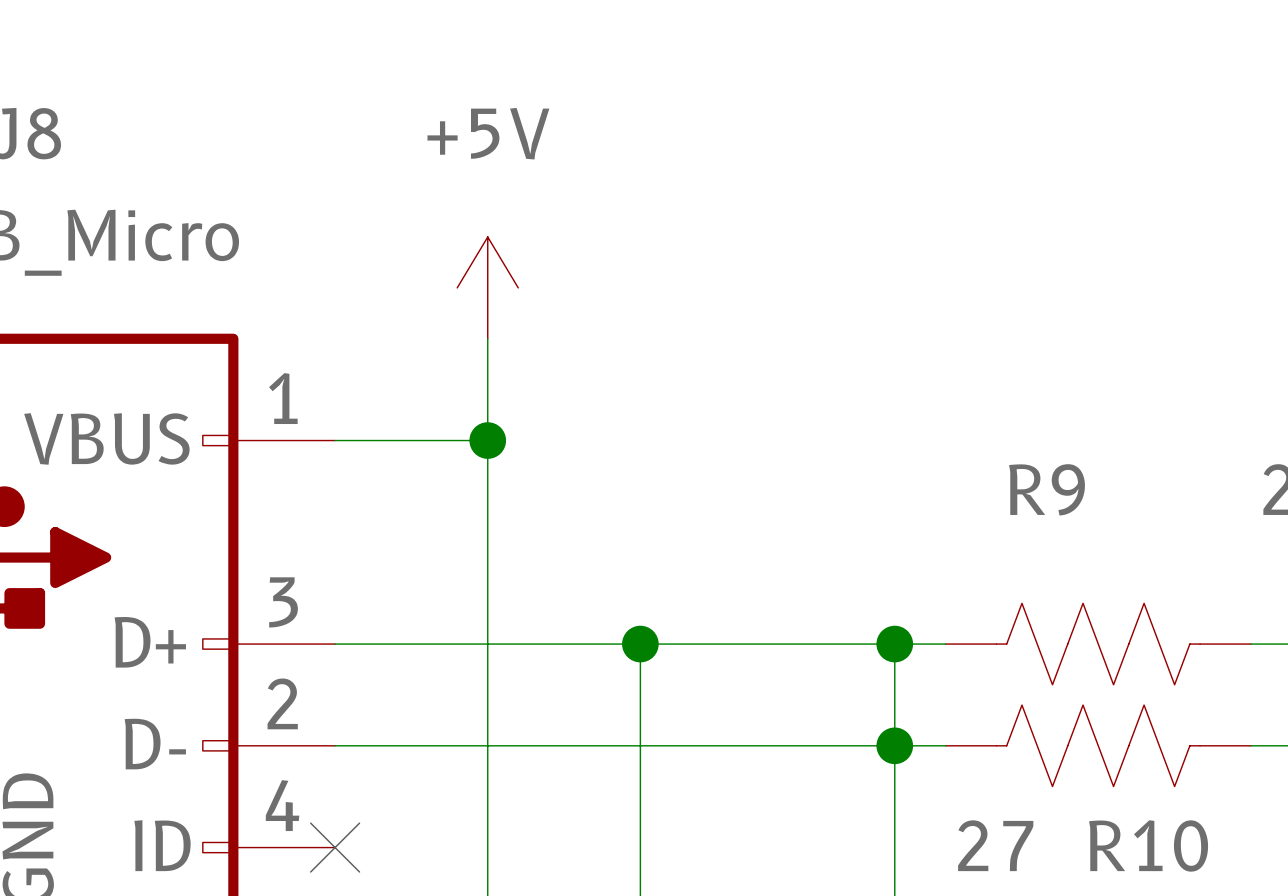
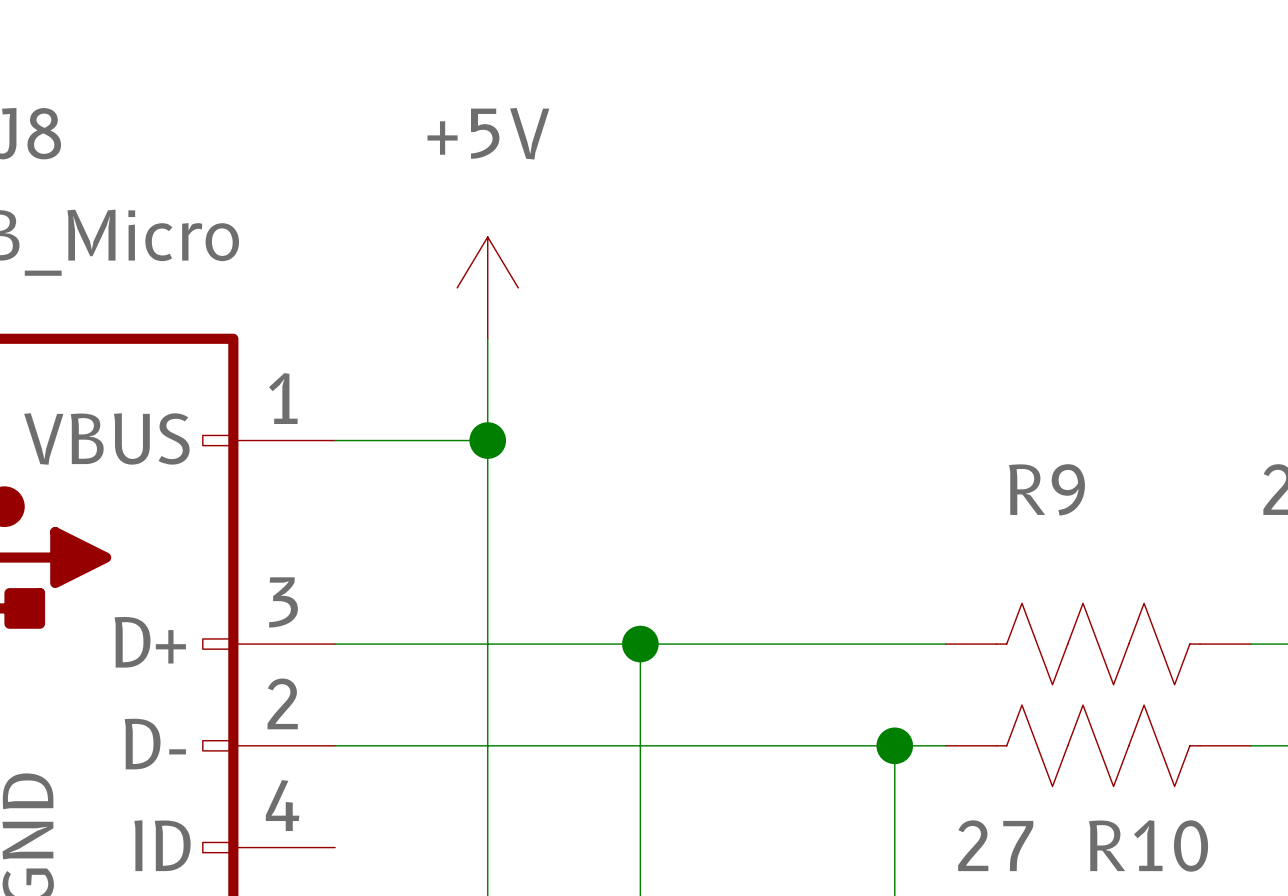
wire: (894, 644) (894, 745) -> none
junction: (894, 644) -> none
no-connect mark: (335, 847) -> none

